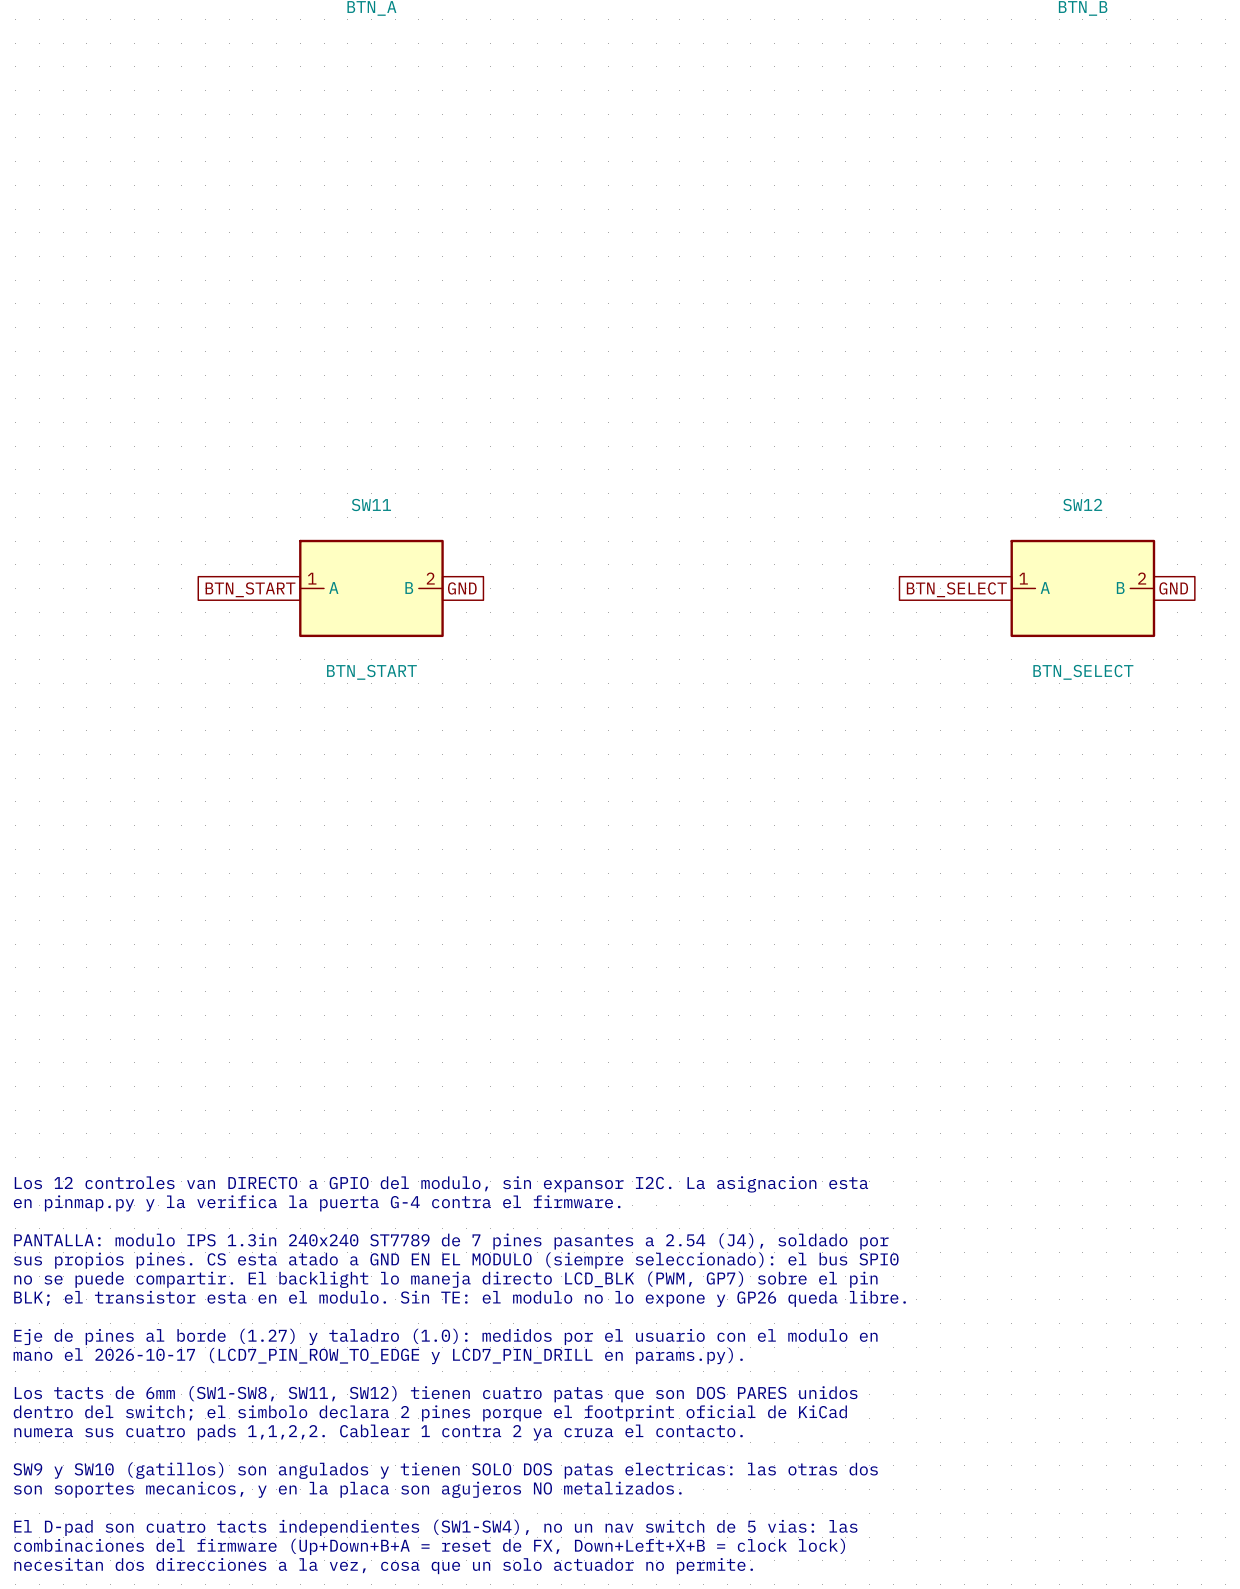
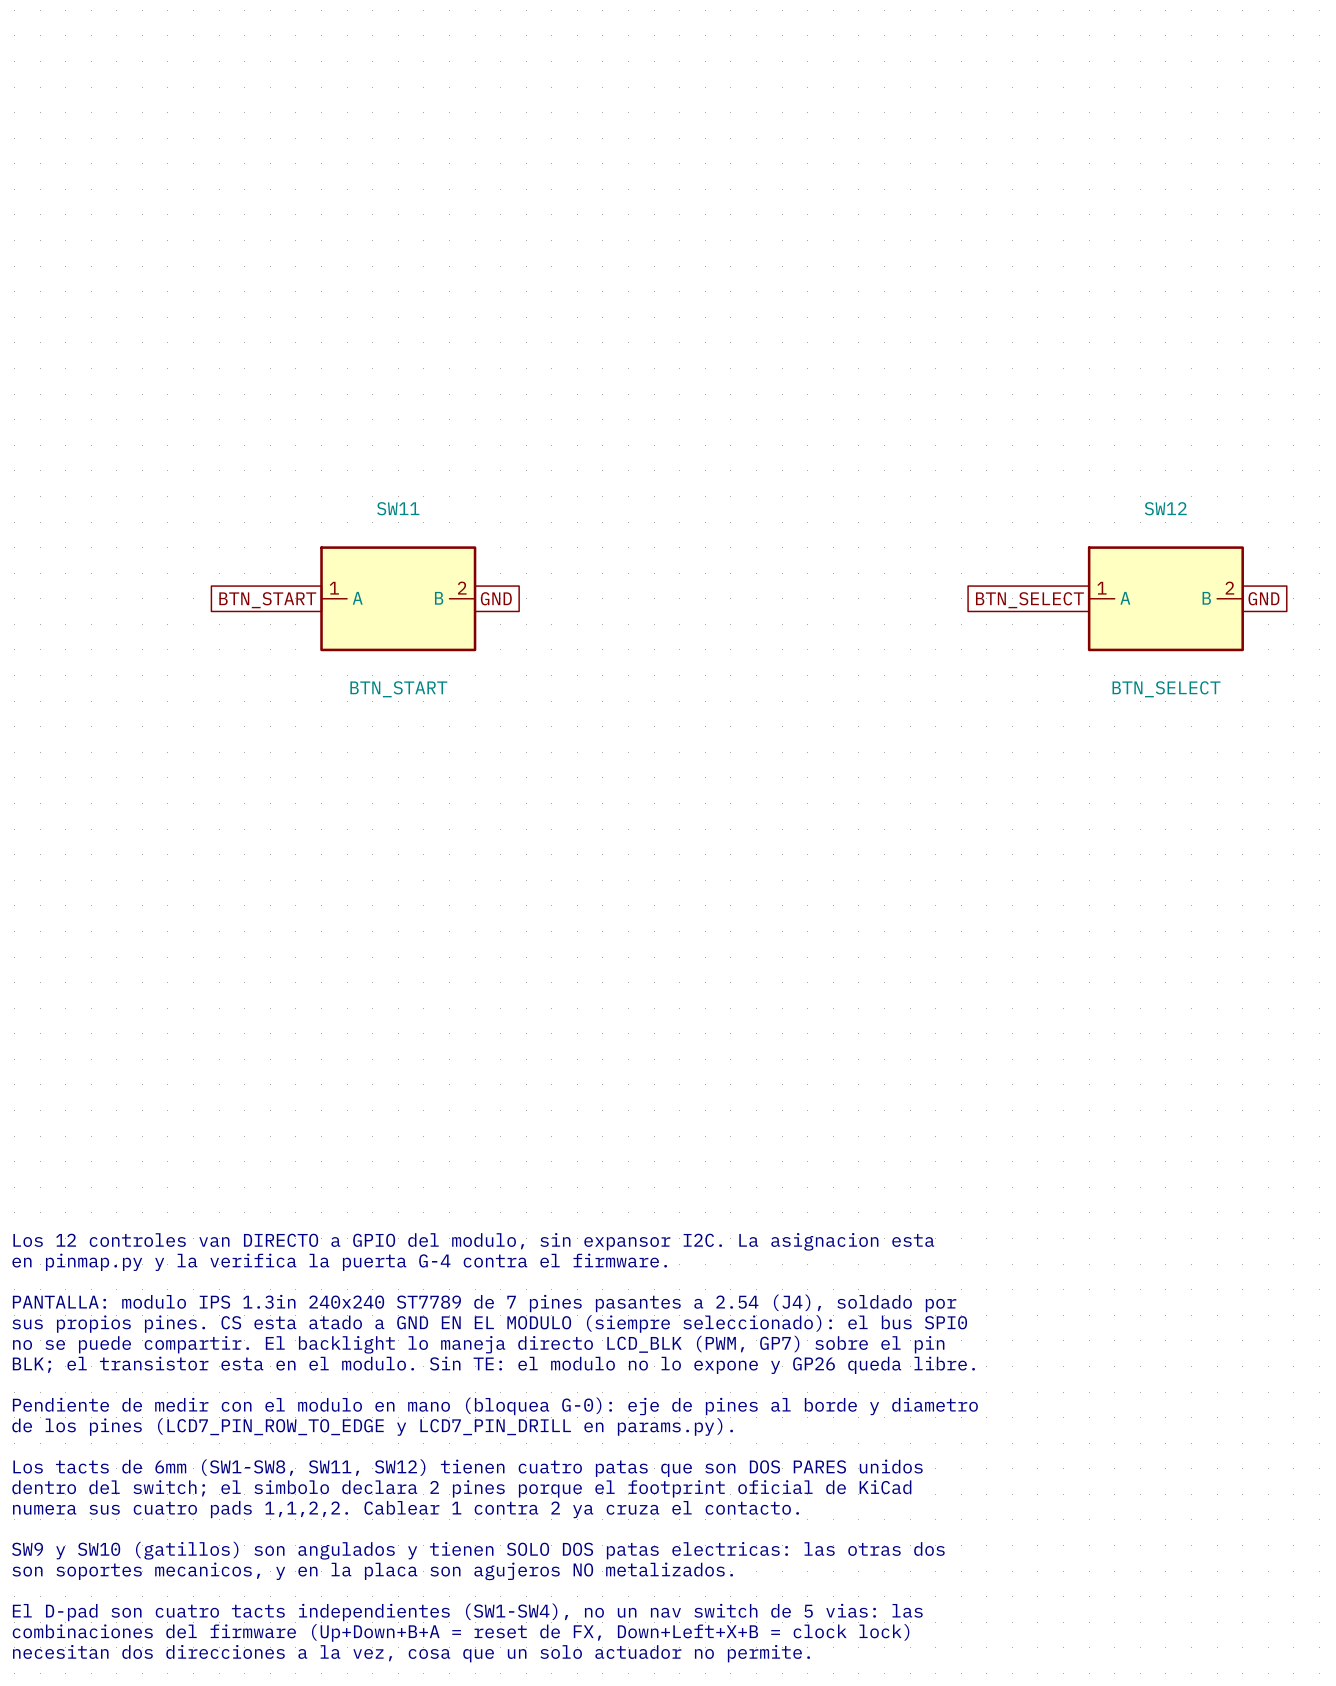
text: Eje de pines al borde (1.27) y taladro (1.0): medidos por el usuario con el modulo en (445, 1336) -> Pendiente de medir con el modulo en mano (bloquea G-0): eje de pines al borde y diametro (495, 1406)
text: mano el 2026-10-17 (LCD7_PIN_ROW_TO_EDGE y LCD7_PIN_DRILL en params.py). (378, 1356) -> de los pines (LCD7_PIN_ROW_TO_EDGE y LCD7_PIN_DRILL en params.py). (372, 1426)

